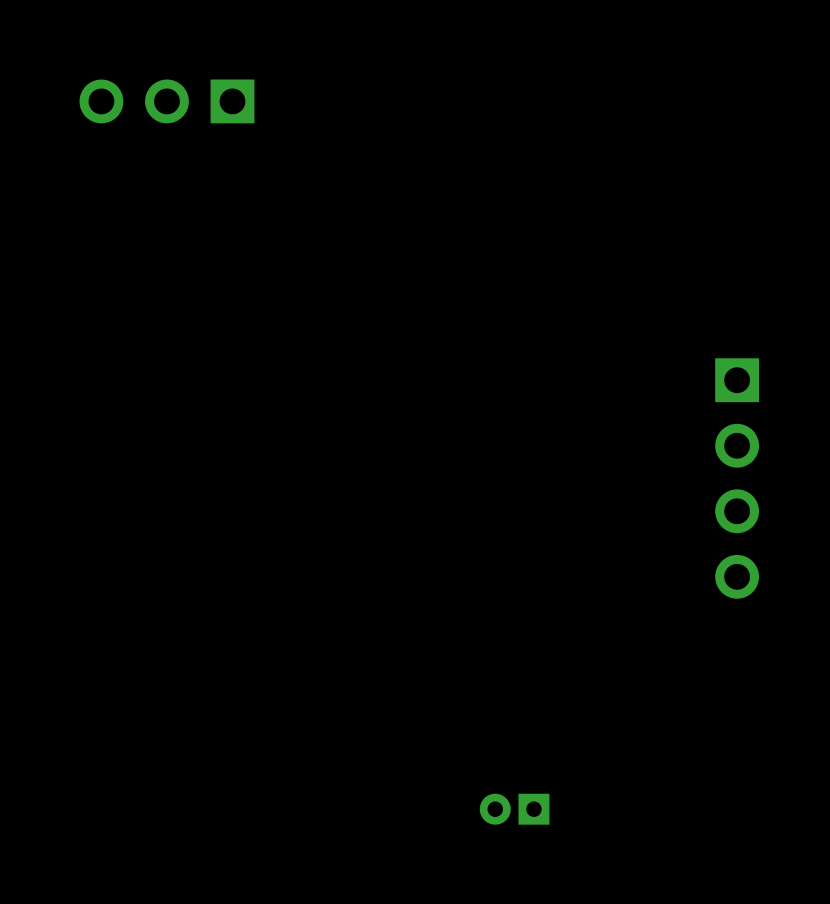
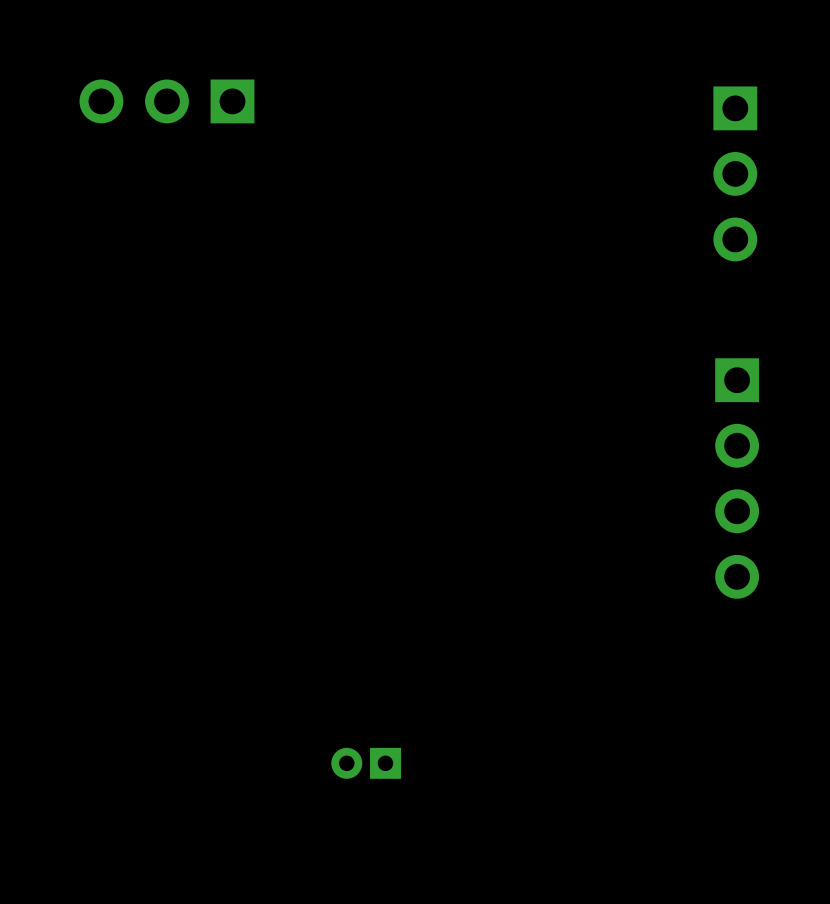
part: none -> (735, 173)
part position: (514, 809) -> (366, 763)

